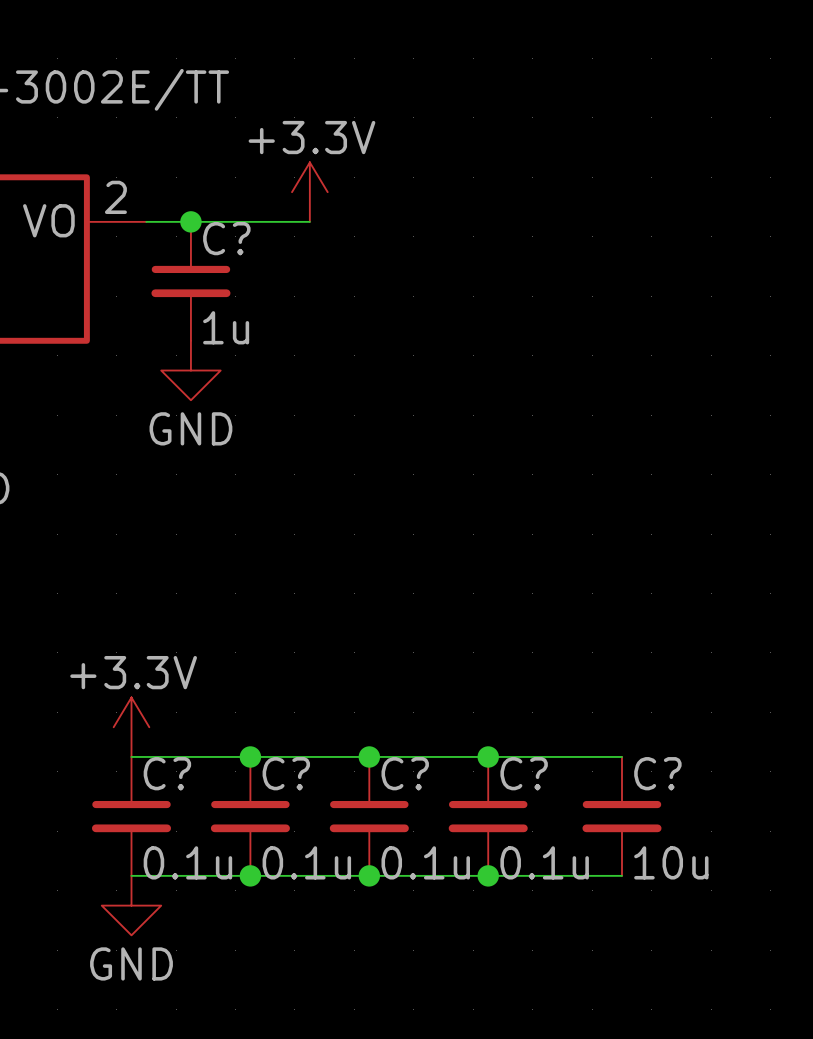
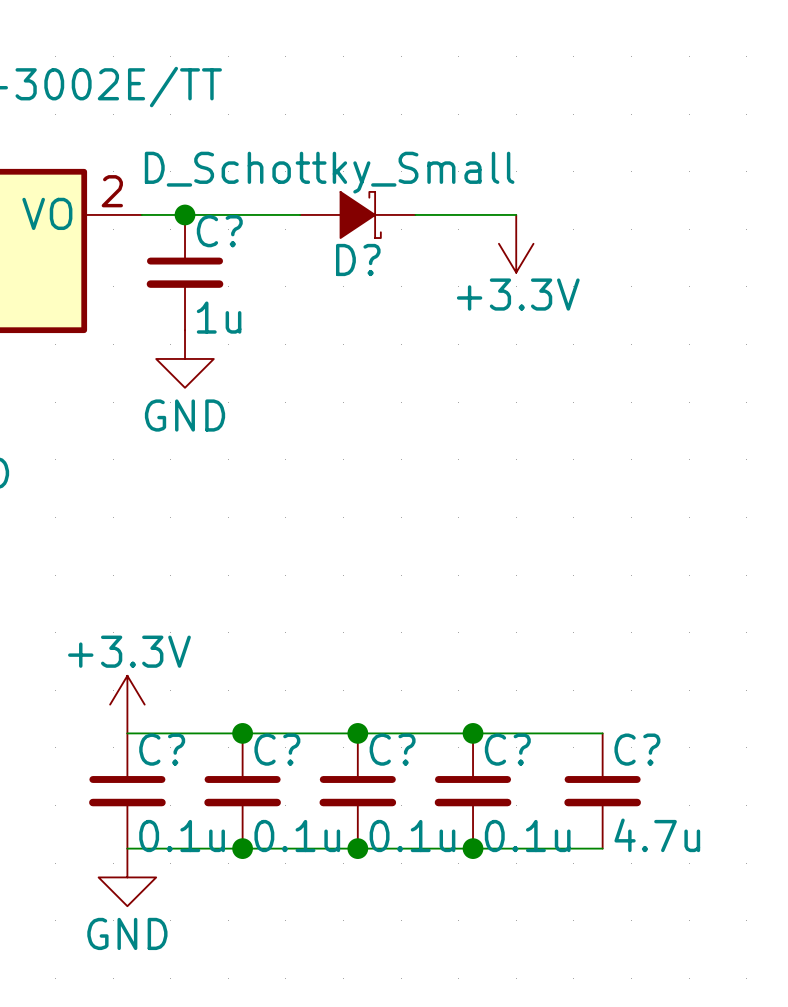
power symbol rotation: 0° (309, 192) -> 180° (516, 243)
power symbol position: +3.3V (309, 192) -> +3.3V (516, 243)
D?: none -> D_Schottky_Small (357, 214)
wire: none -> (415, 214) (516, 214)
C? value: 10u (671, 862) -> 4.7u (657, 835)

